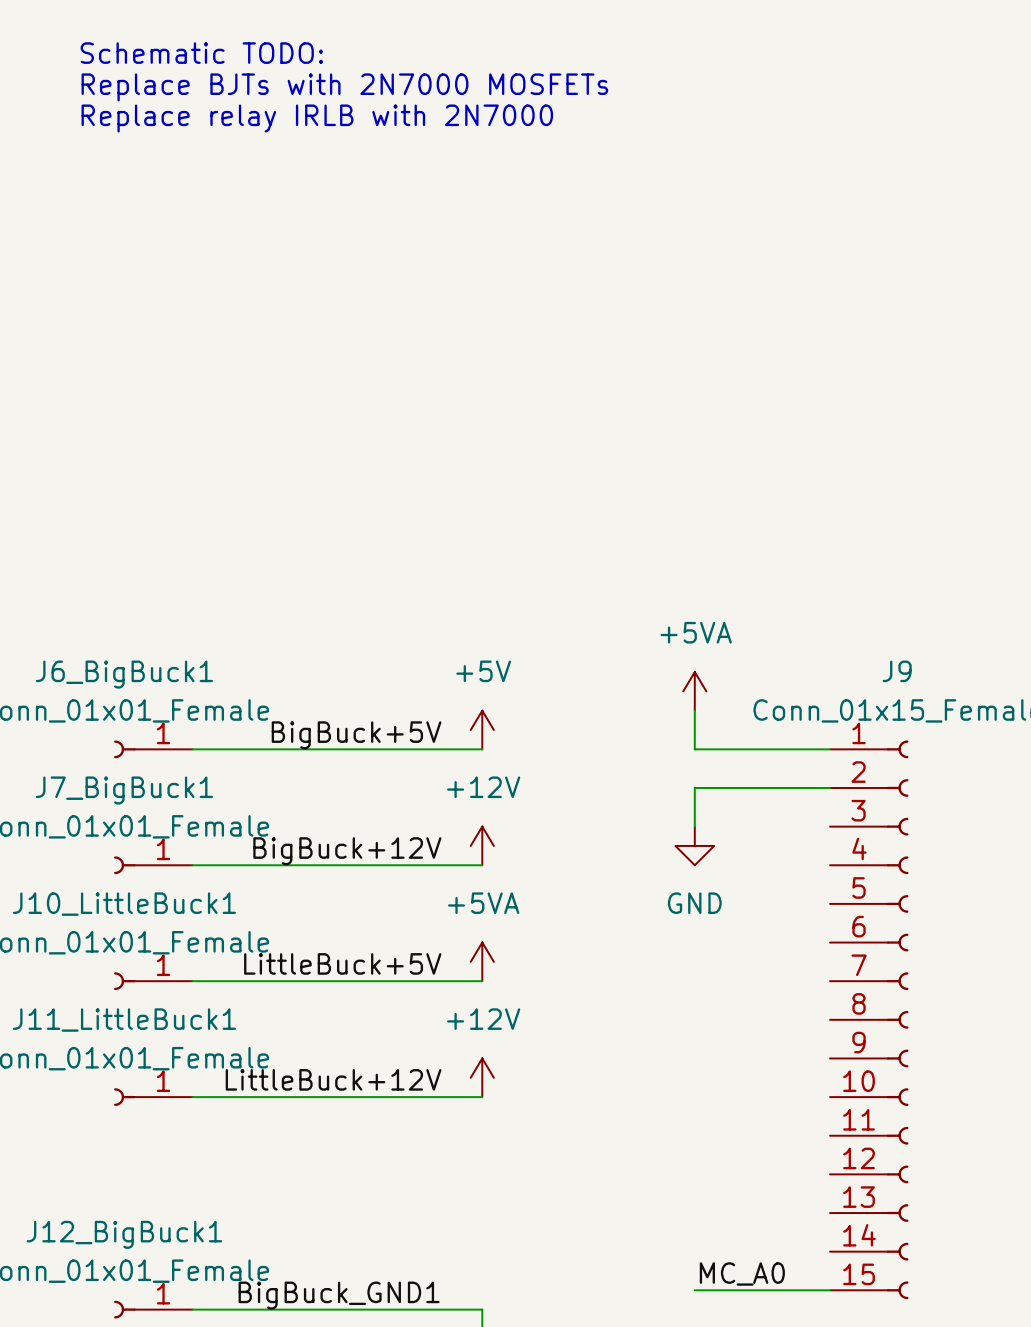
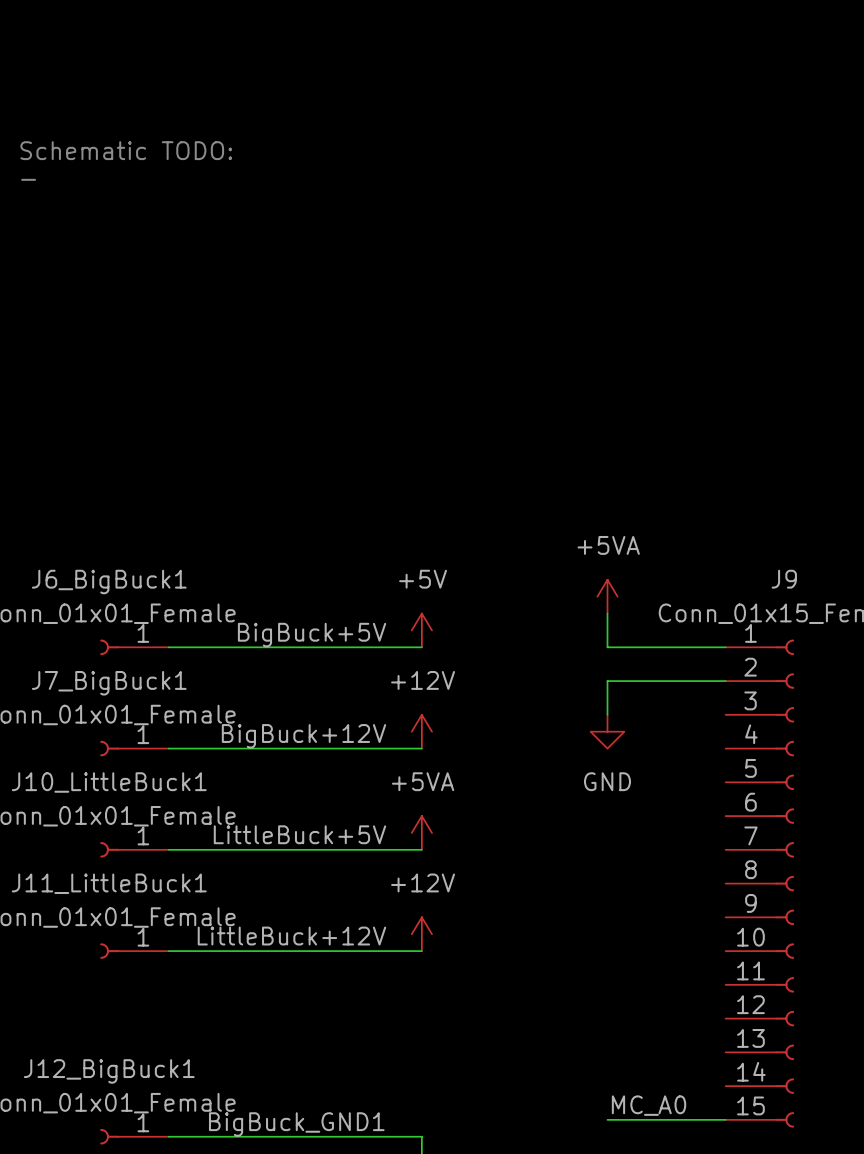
text position: Schematic TODO: (201, 53) -> Schematic TODO: (126, 150)
text: Replace BJTs with 2N7000 MOSFETs (344, 87) -> none
text: Replace relay IRLB with 2N7000 (317, 118) -> none
text: none -> - (28, 179)

